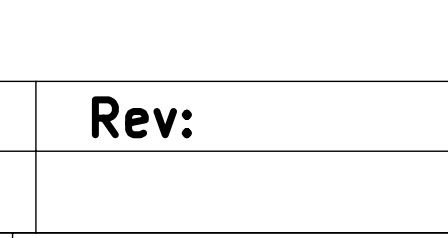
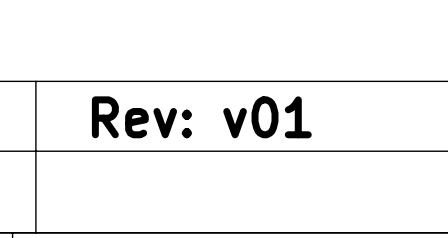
title block: Rev: (141, 117) -> Rev: v01 (201, 117)

